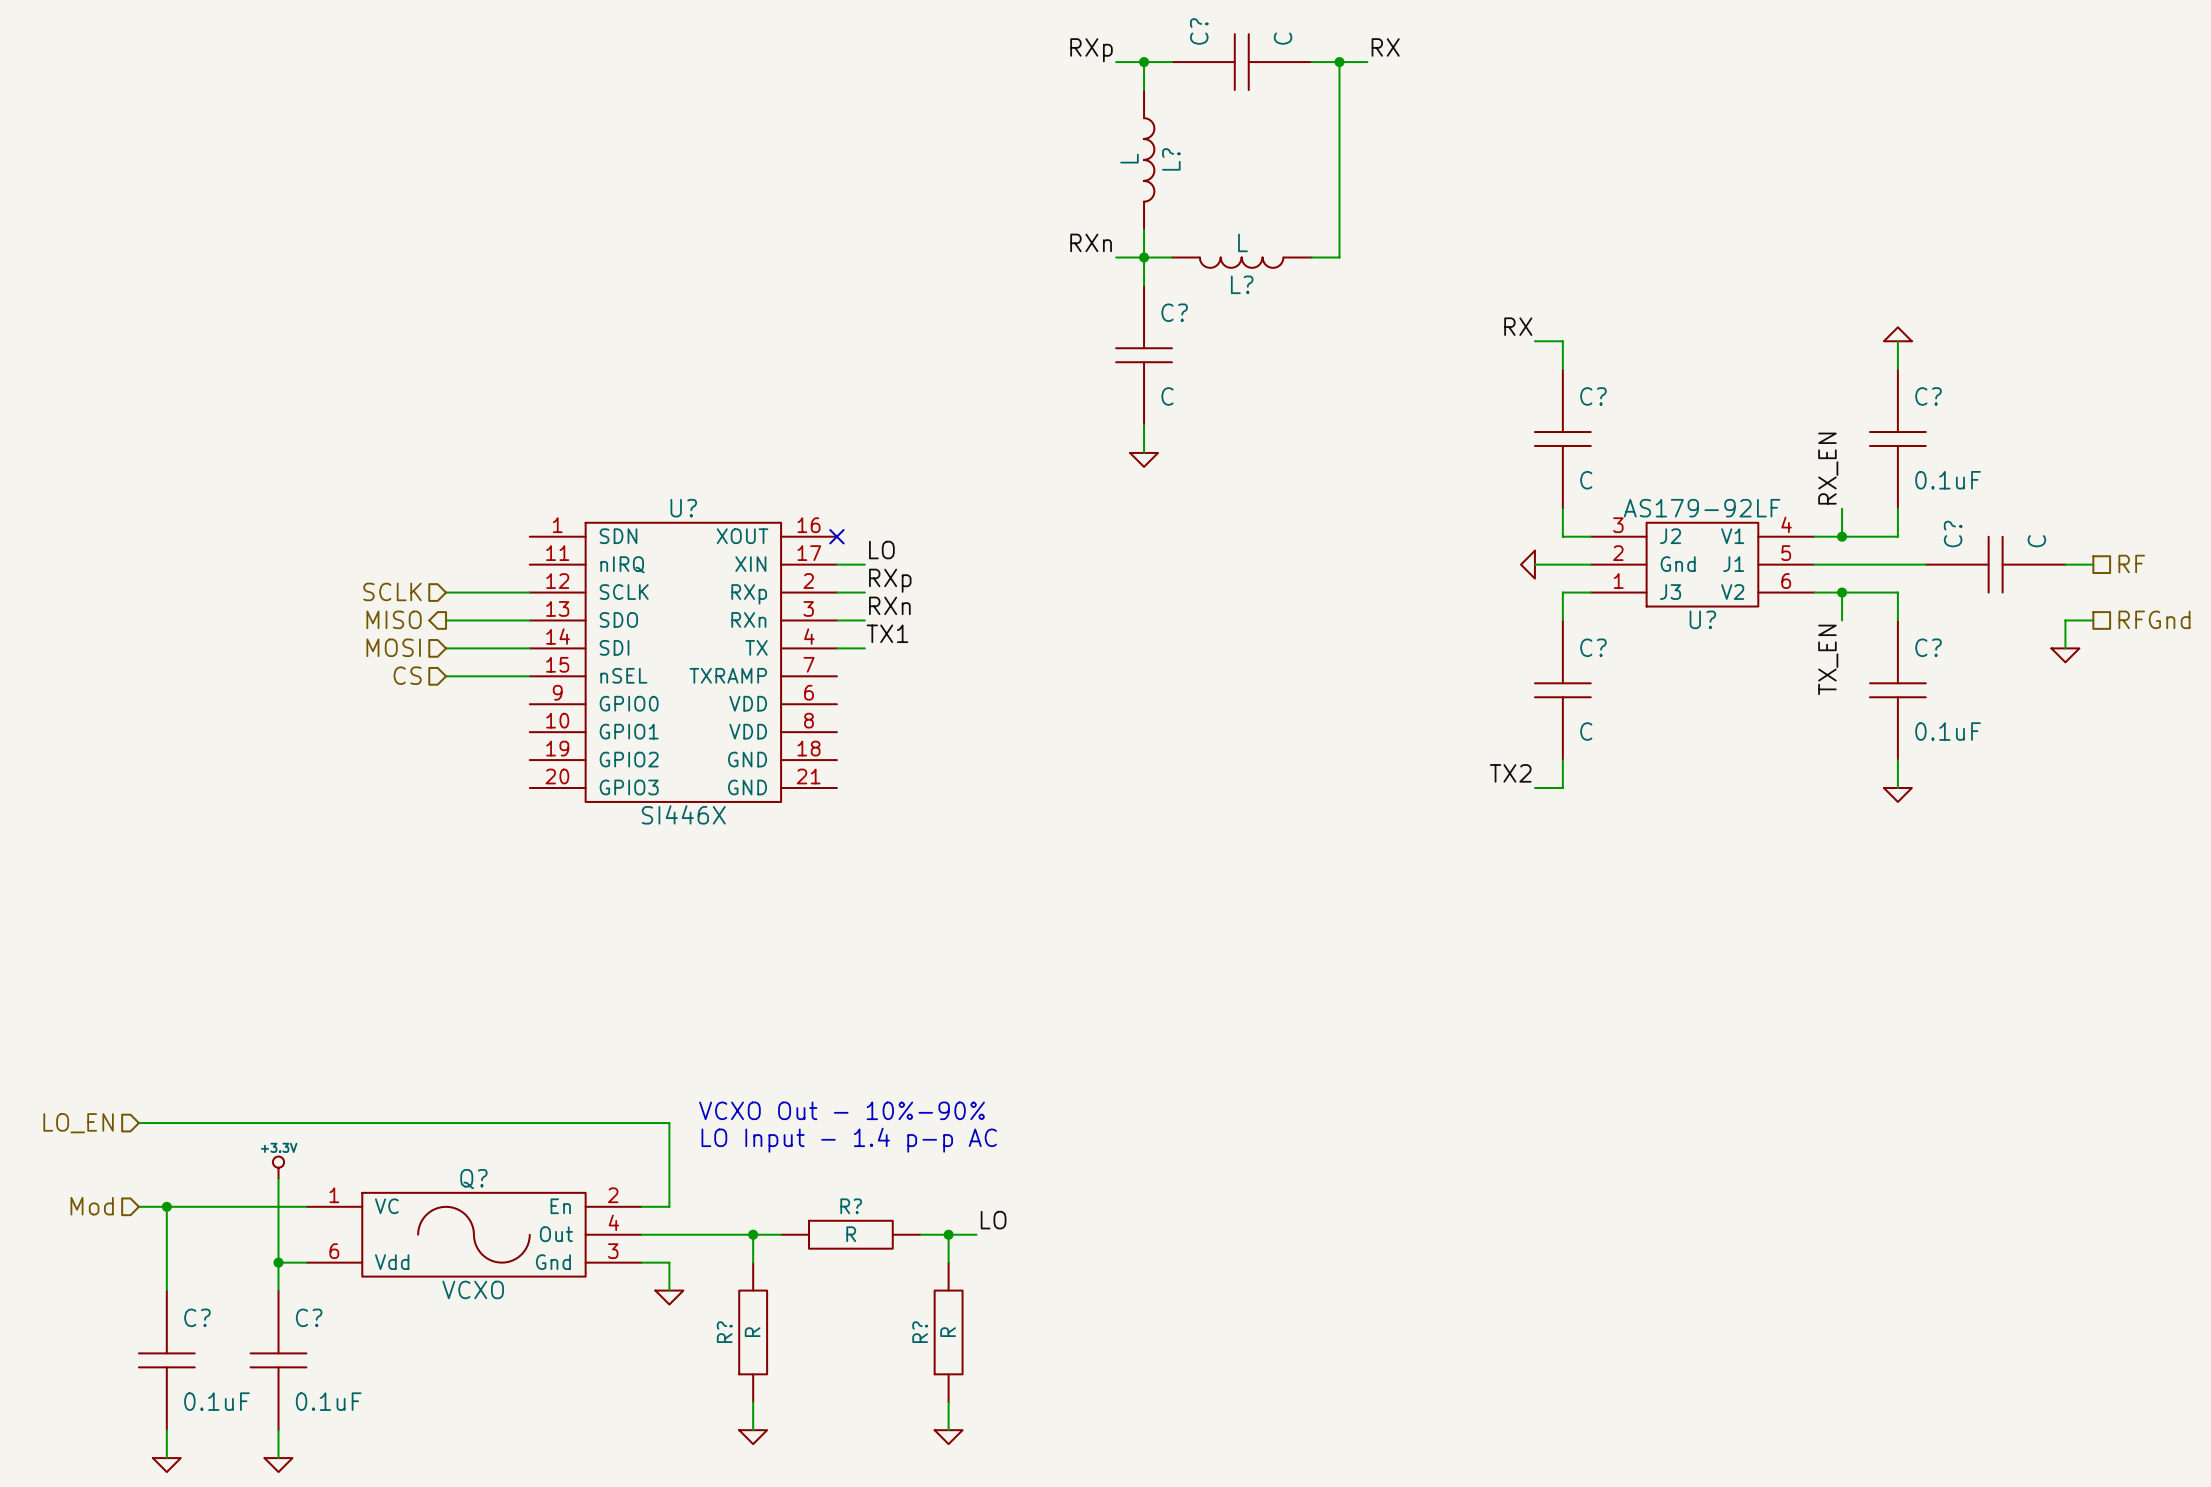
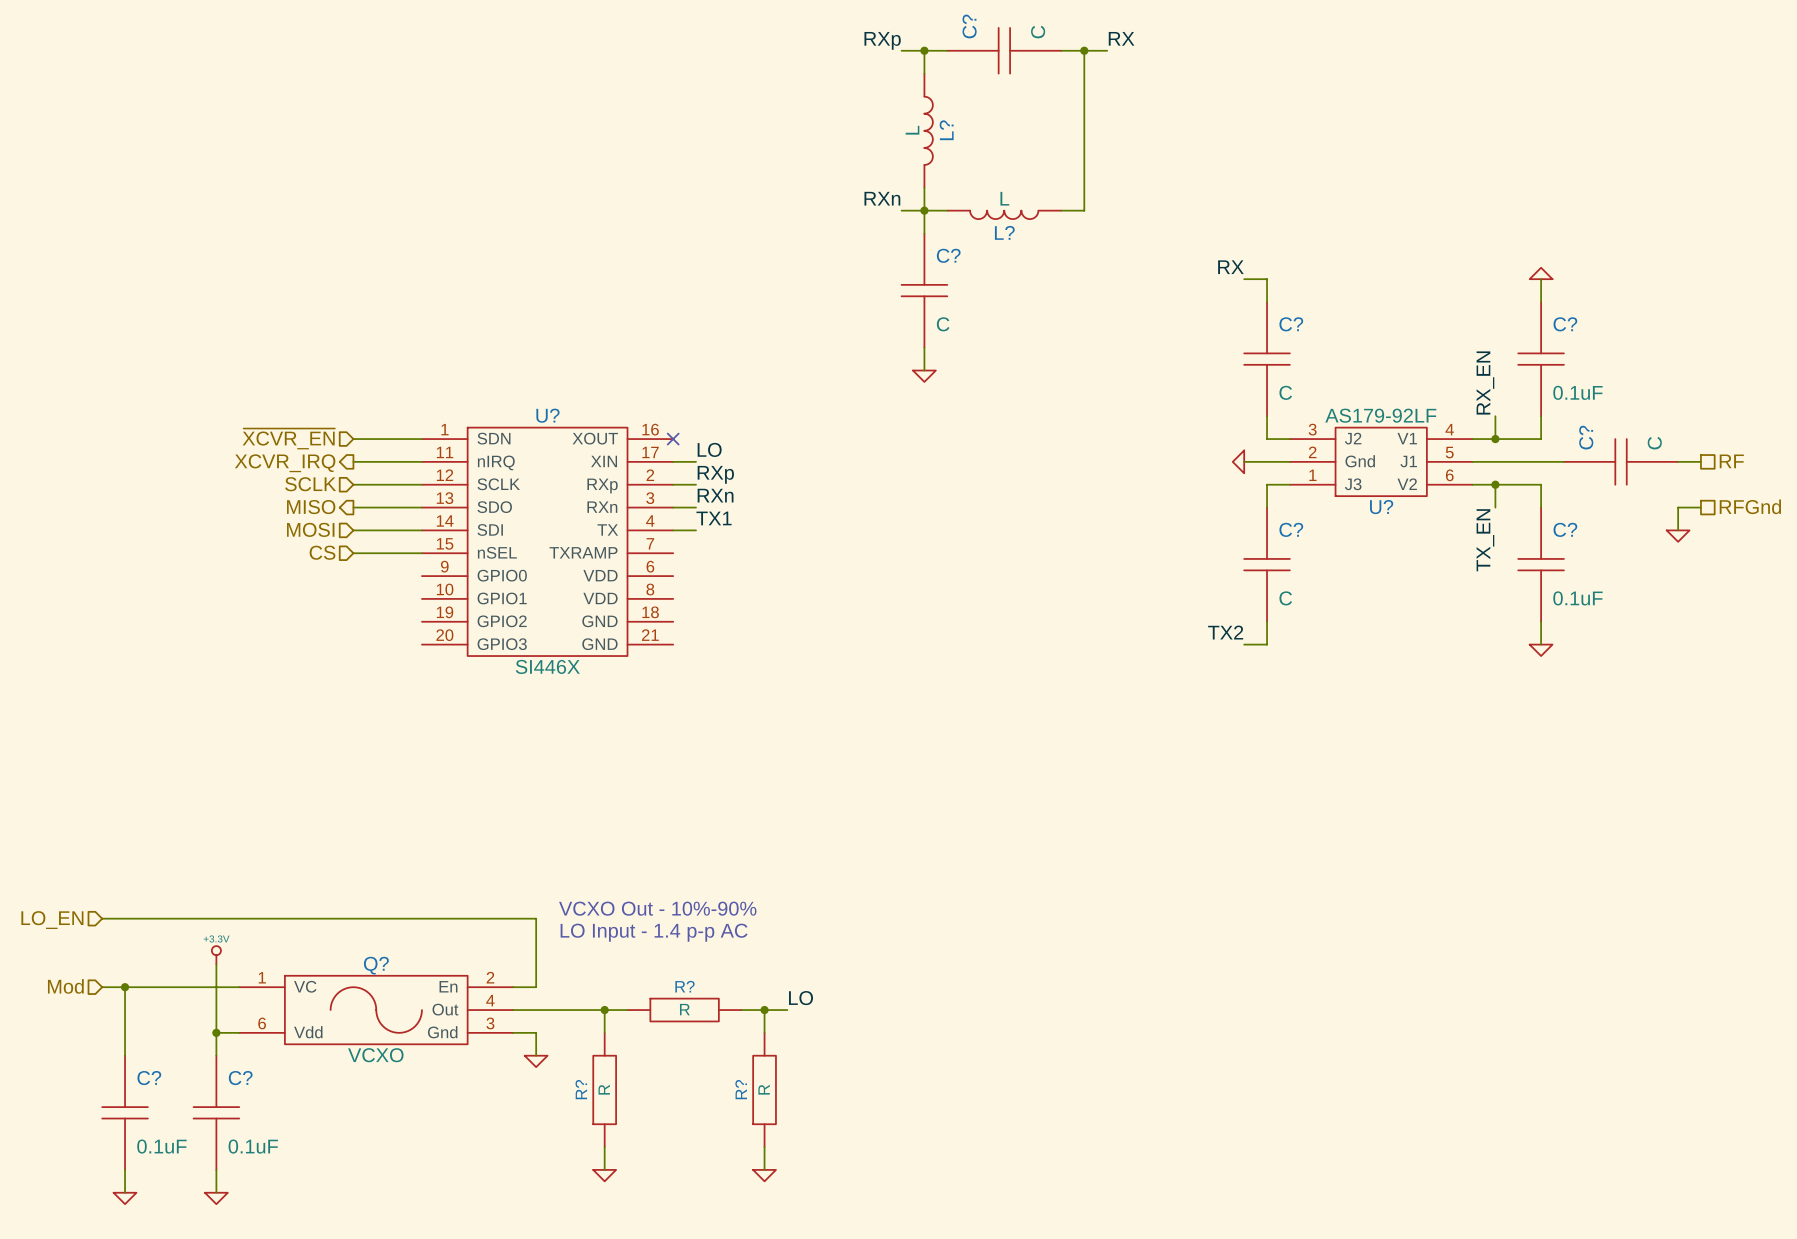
hierarchical label: none -> ~{XCVR_EN} (288, 438)
wire: none -> (353, 439) (421, 439)
hierarchical label: none -> XCVR_IRQ (285, 463)
wire: none -> (353, 461) (421, 461)

